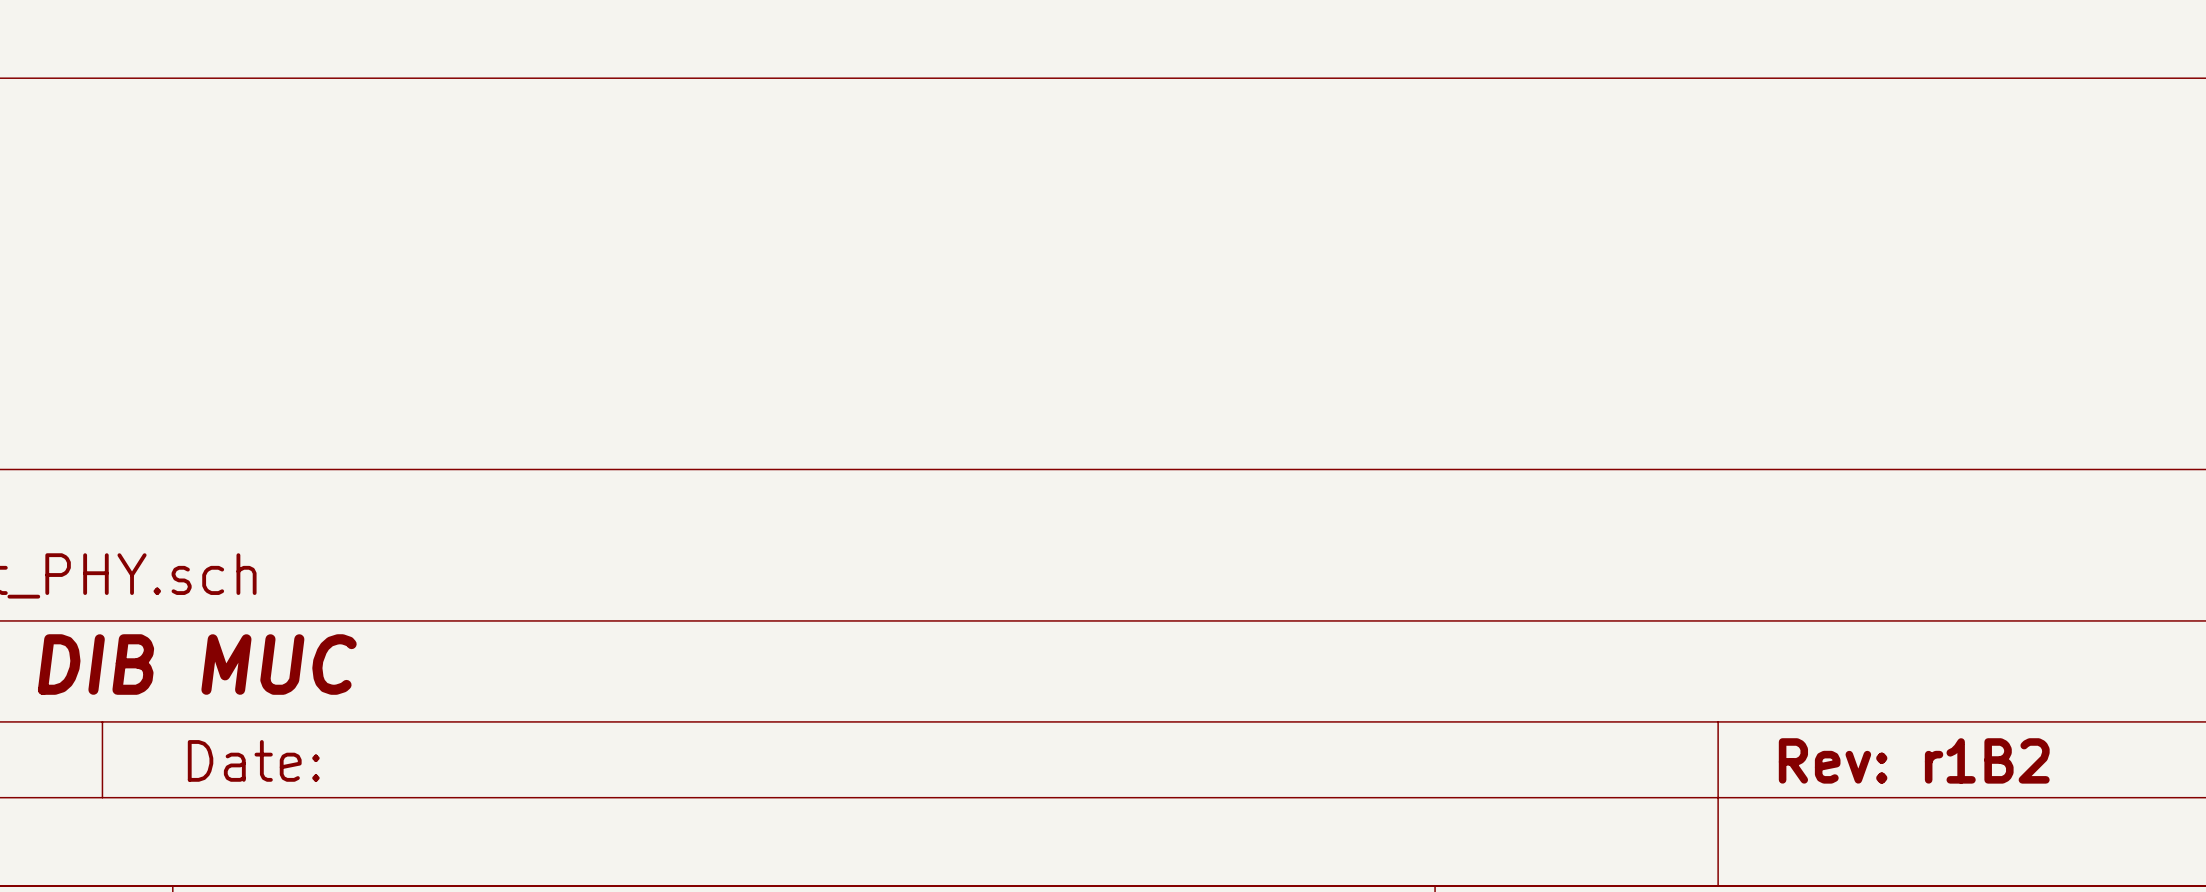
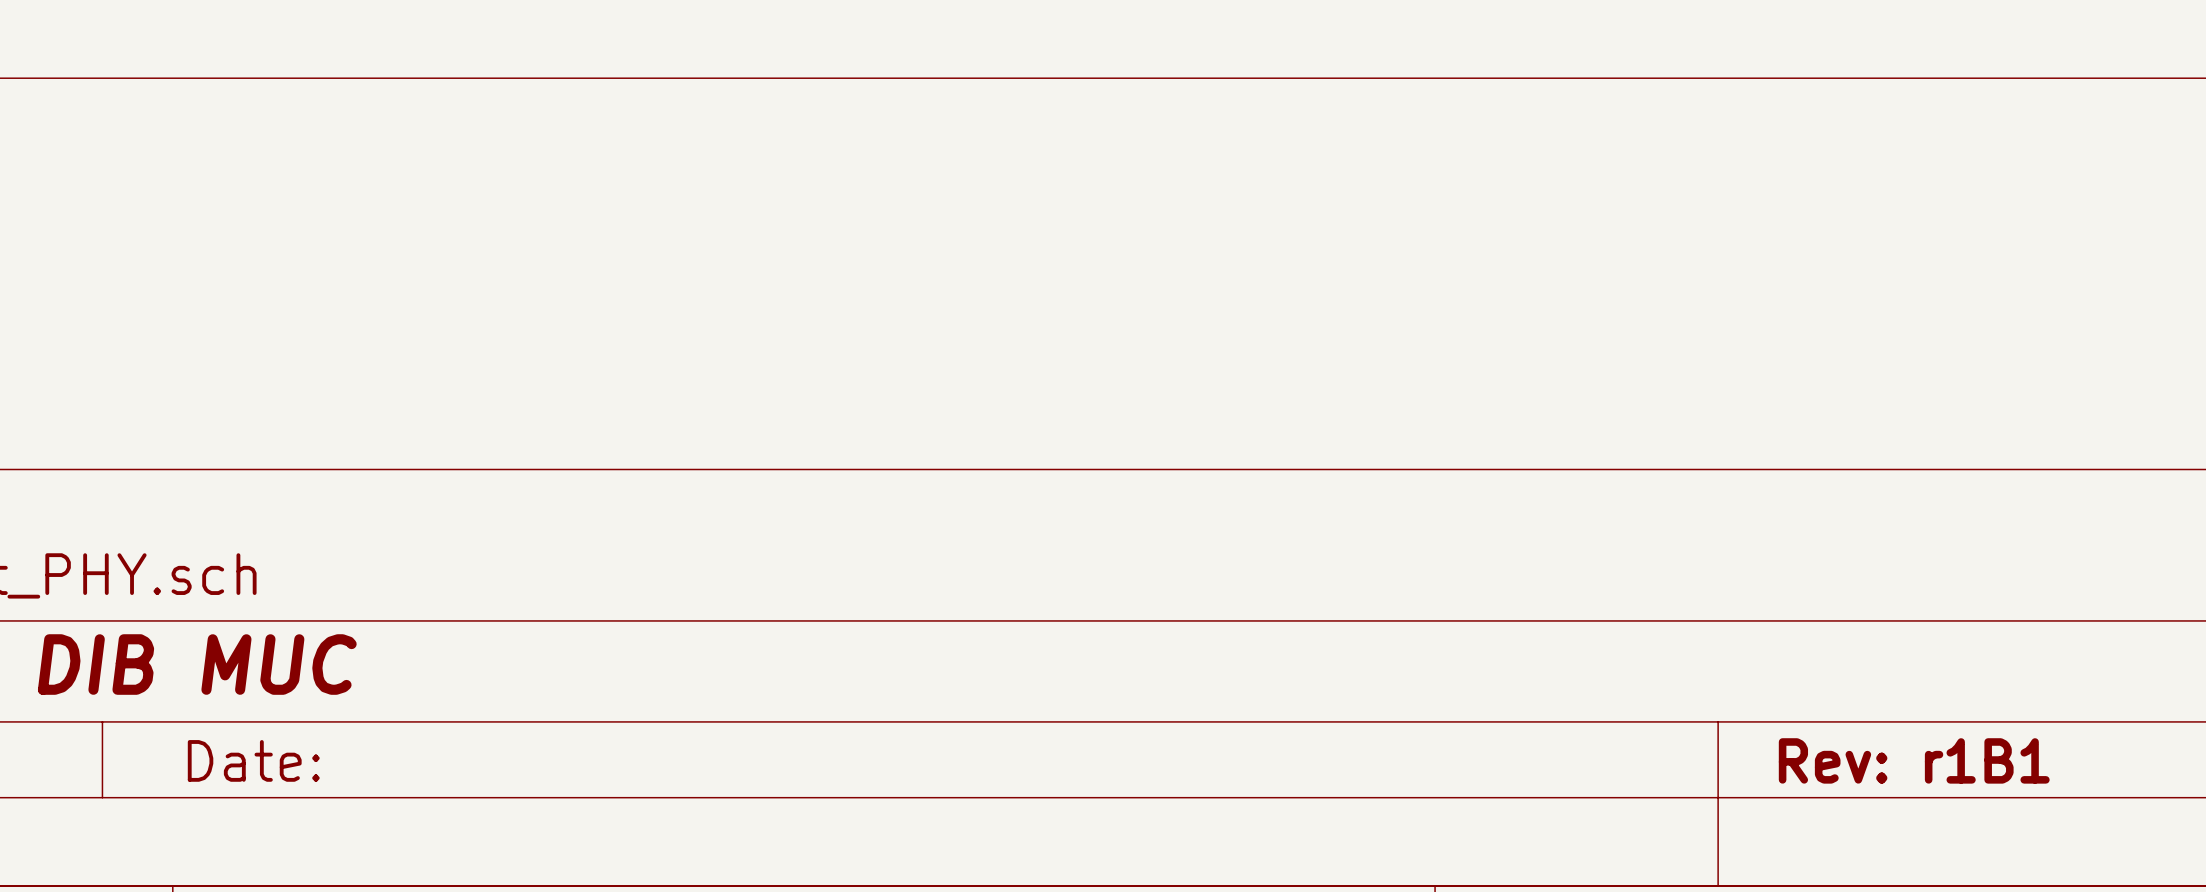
title block: Rev: r1B2 (1914, 760) -> Rev: r1B1 (1914, 760)

